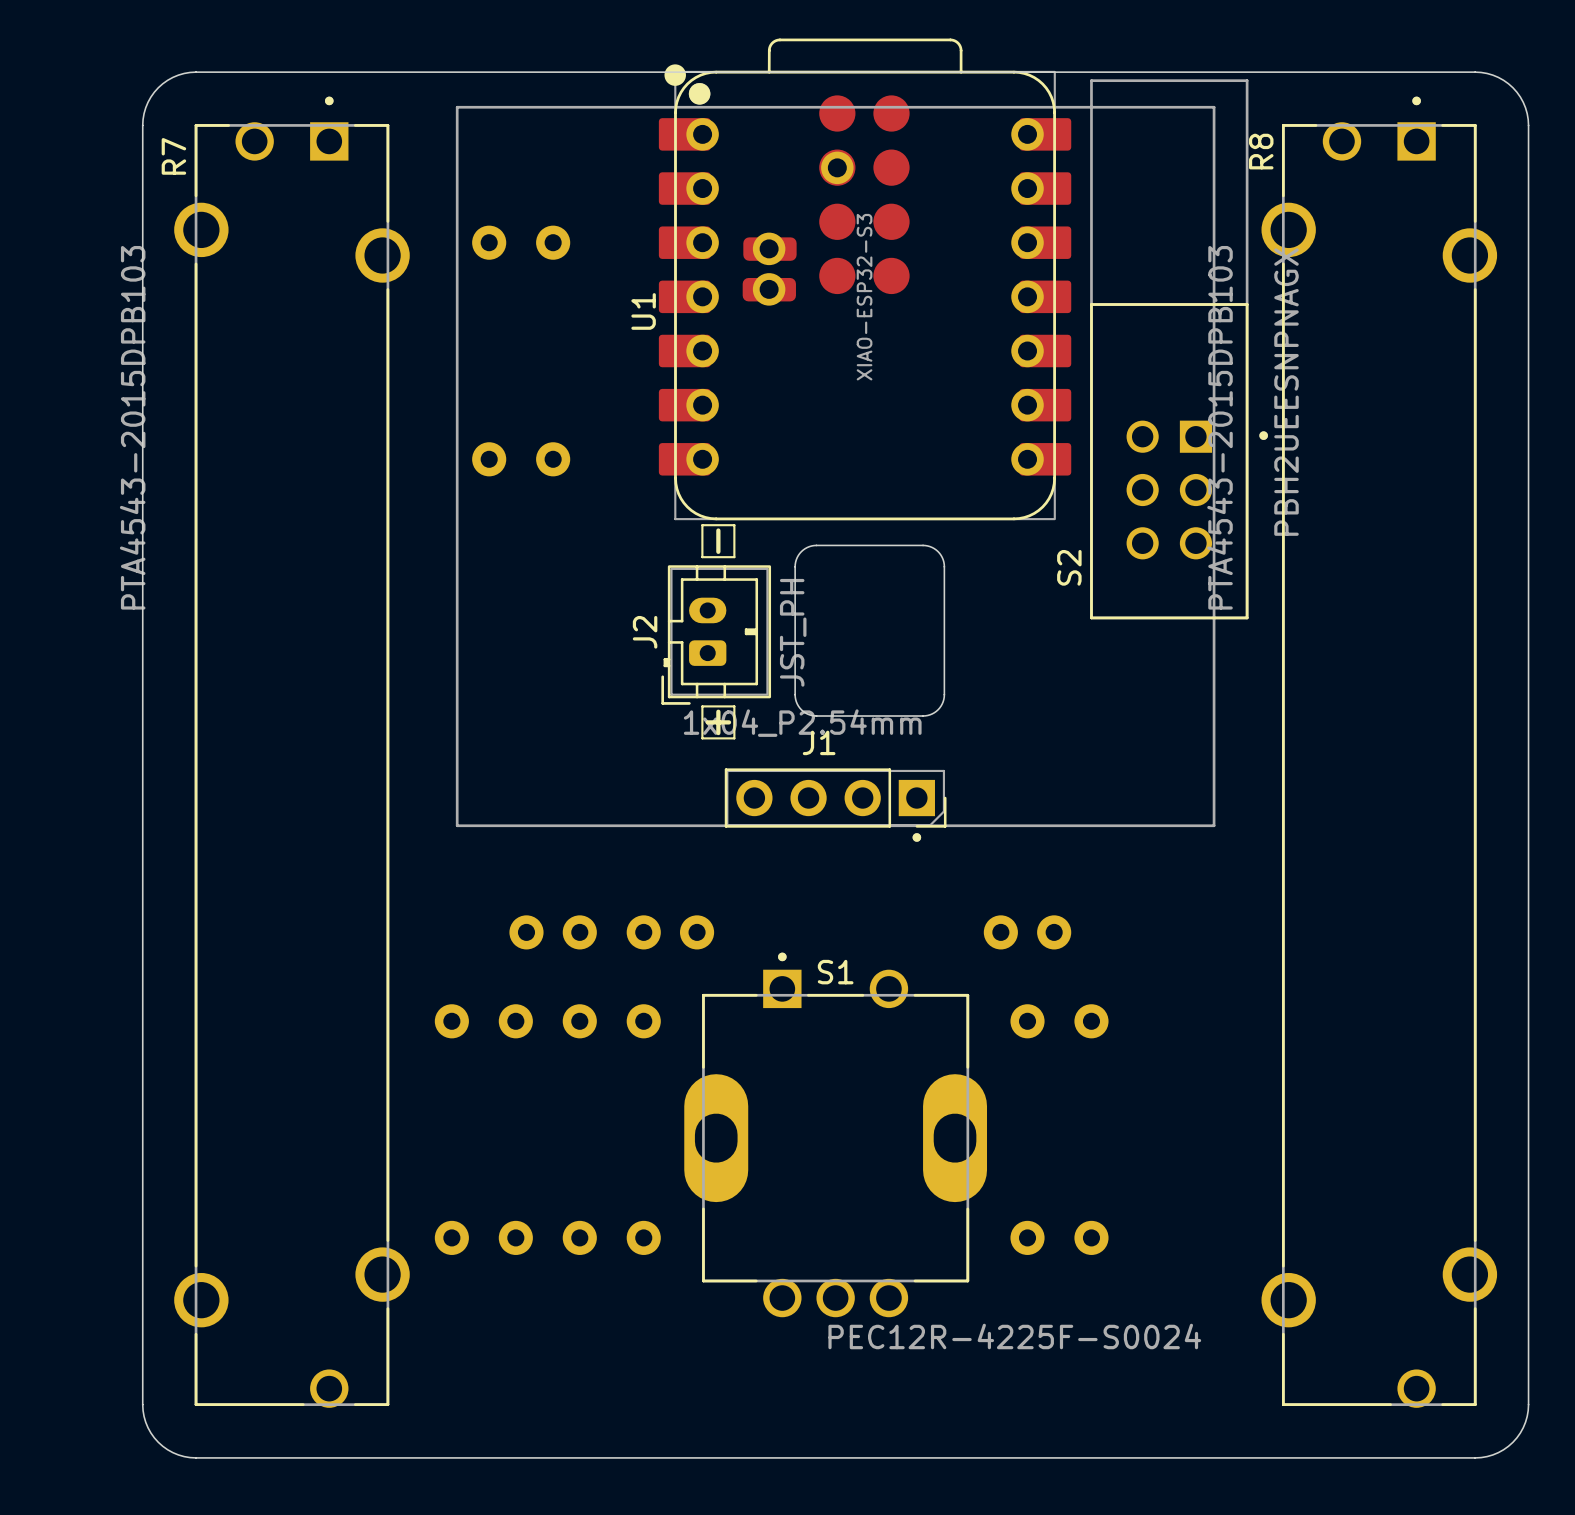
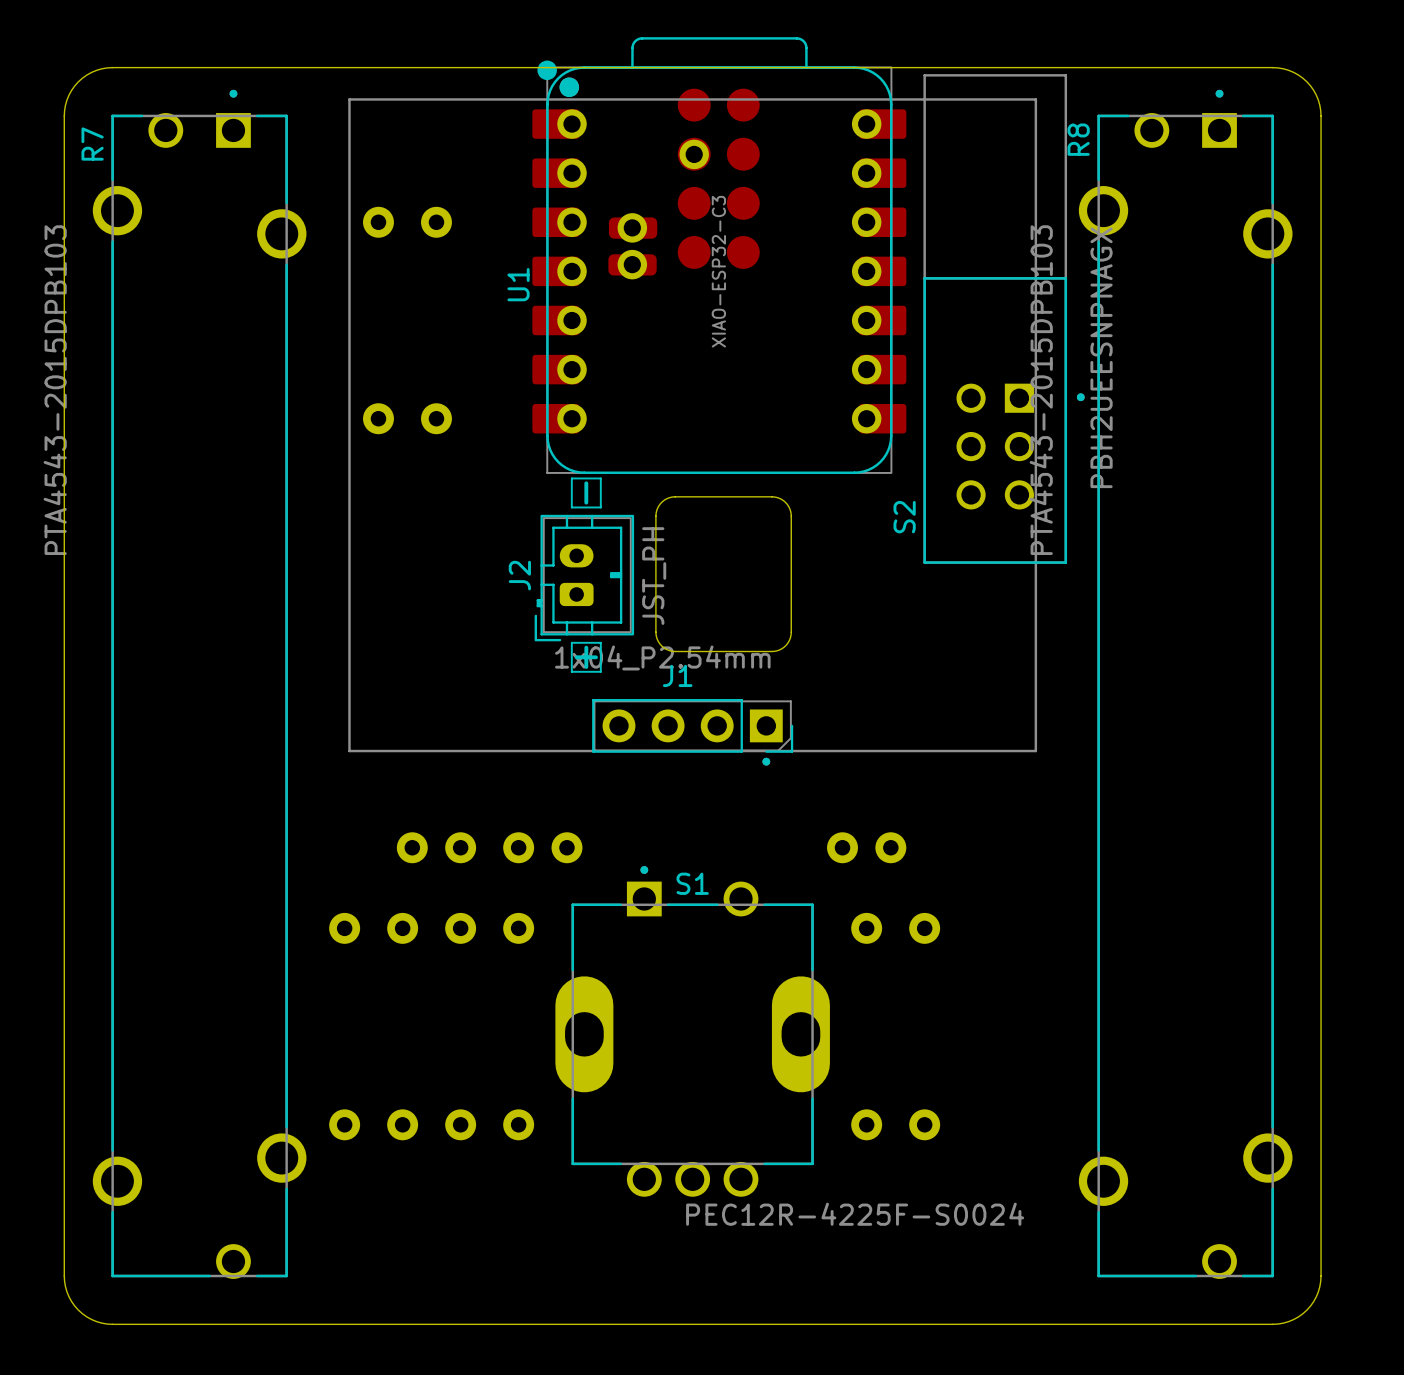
U1 value: XIAO-ESP32-S3 (864, 297) -> XIAO-ESP32-C3 (718, 271)

